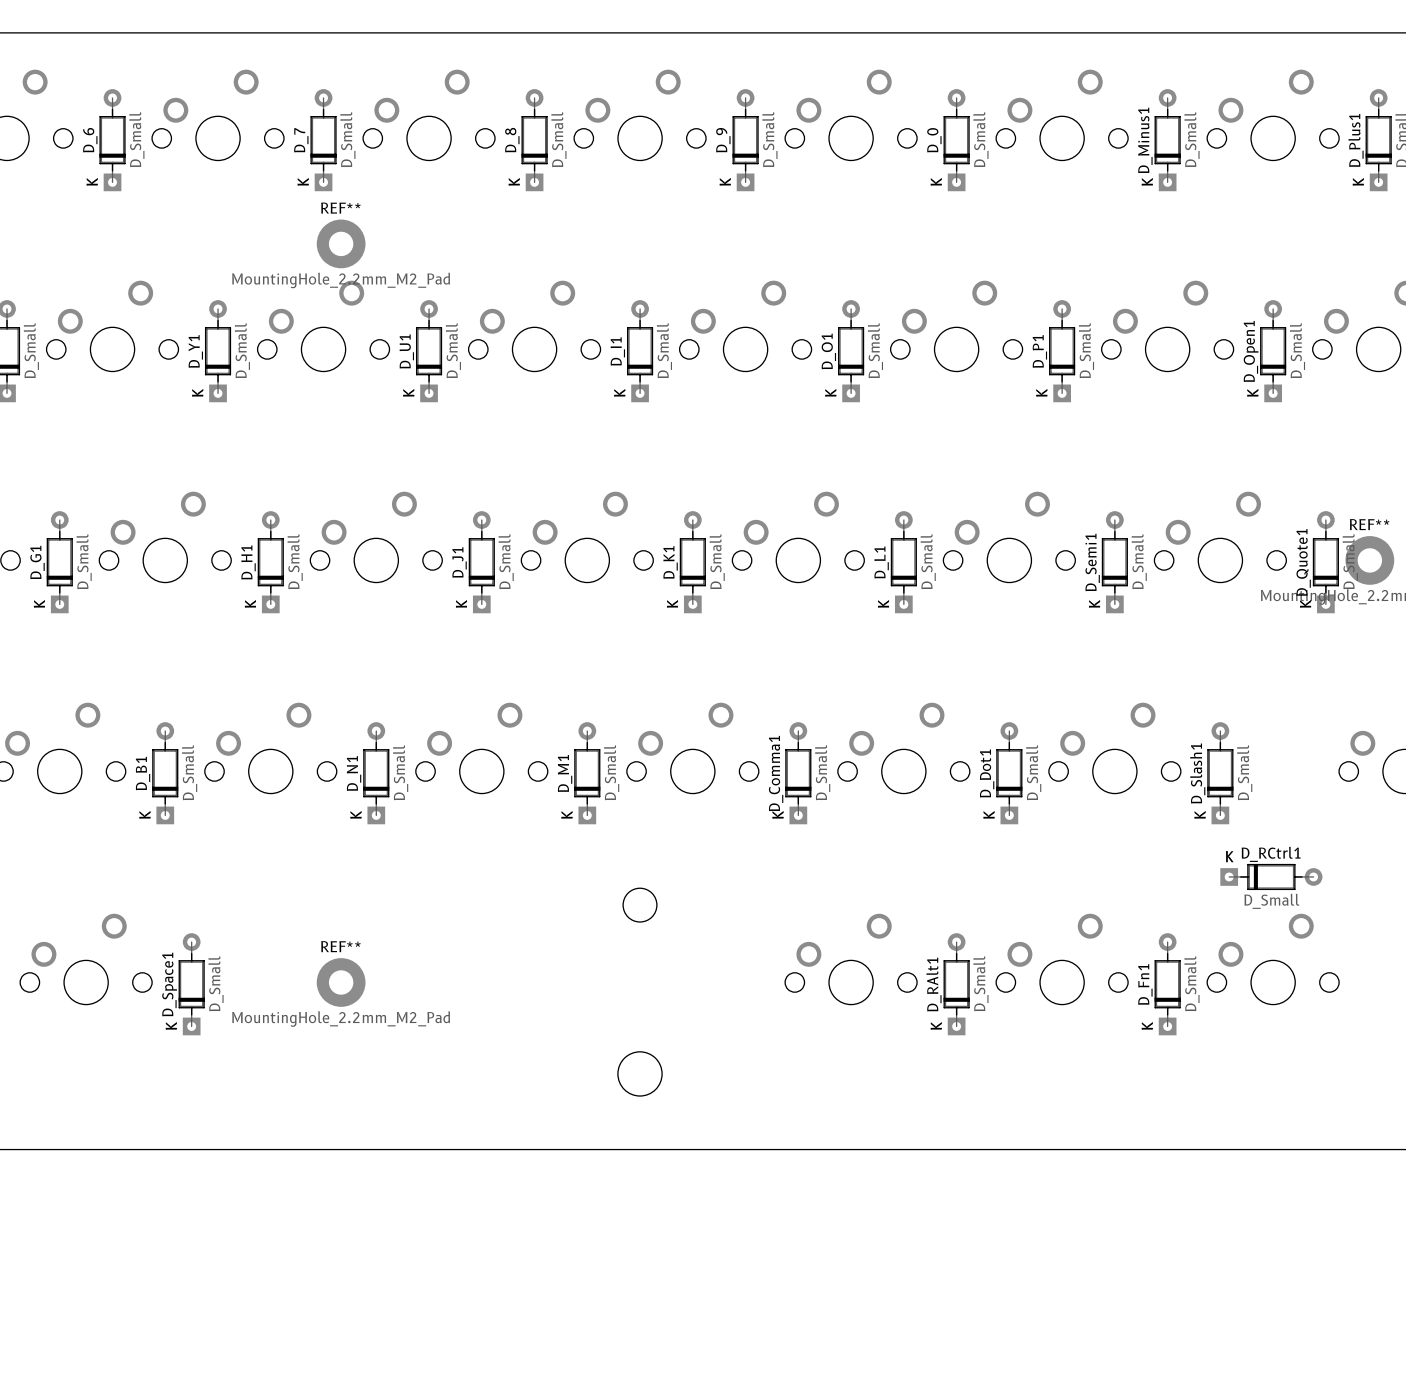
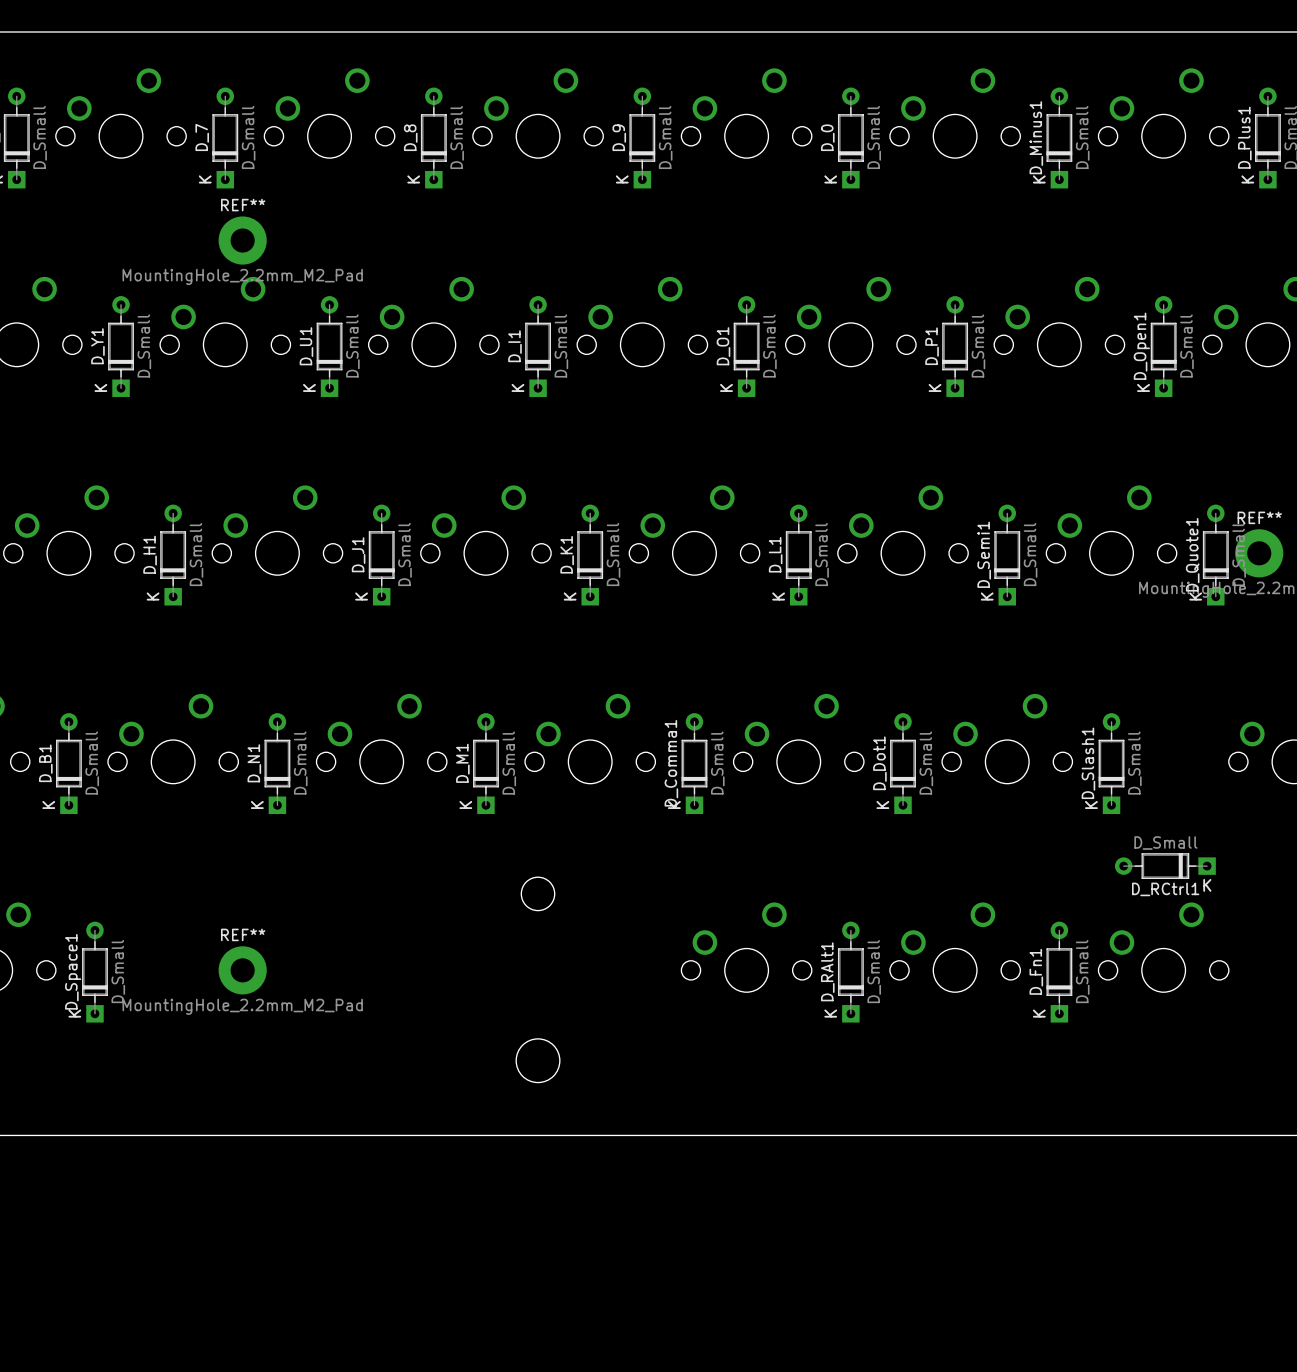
D_RCtrl1 rotation: 0° (1271, 876) -> 180° (1165, 866)

